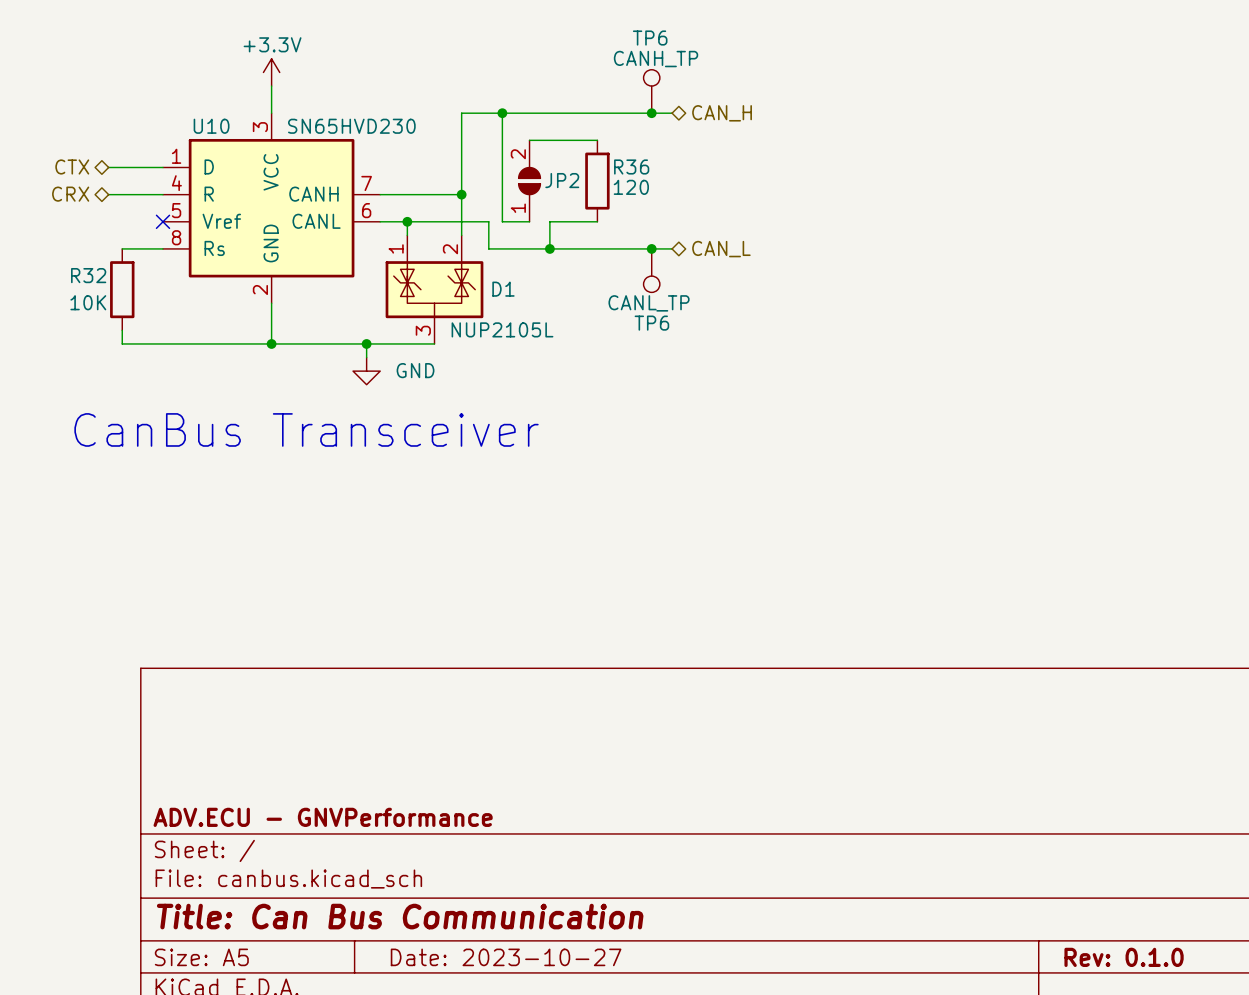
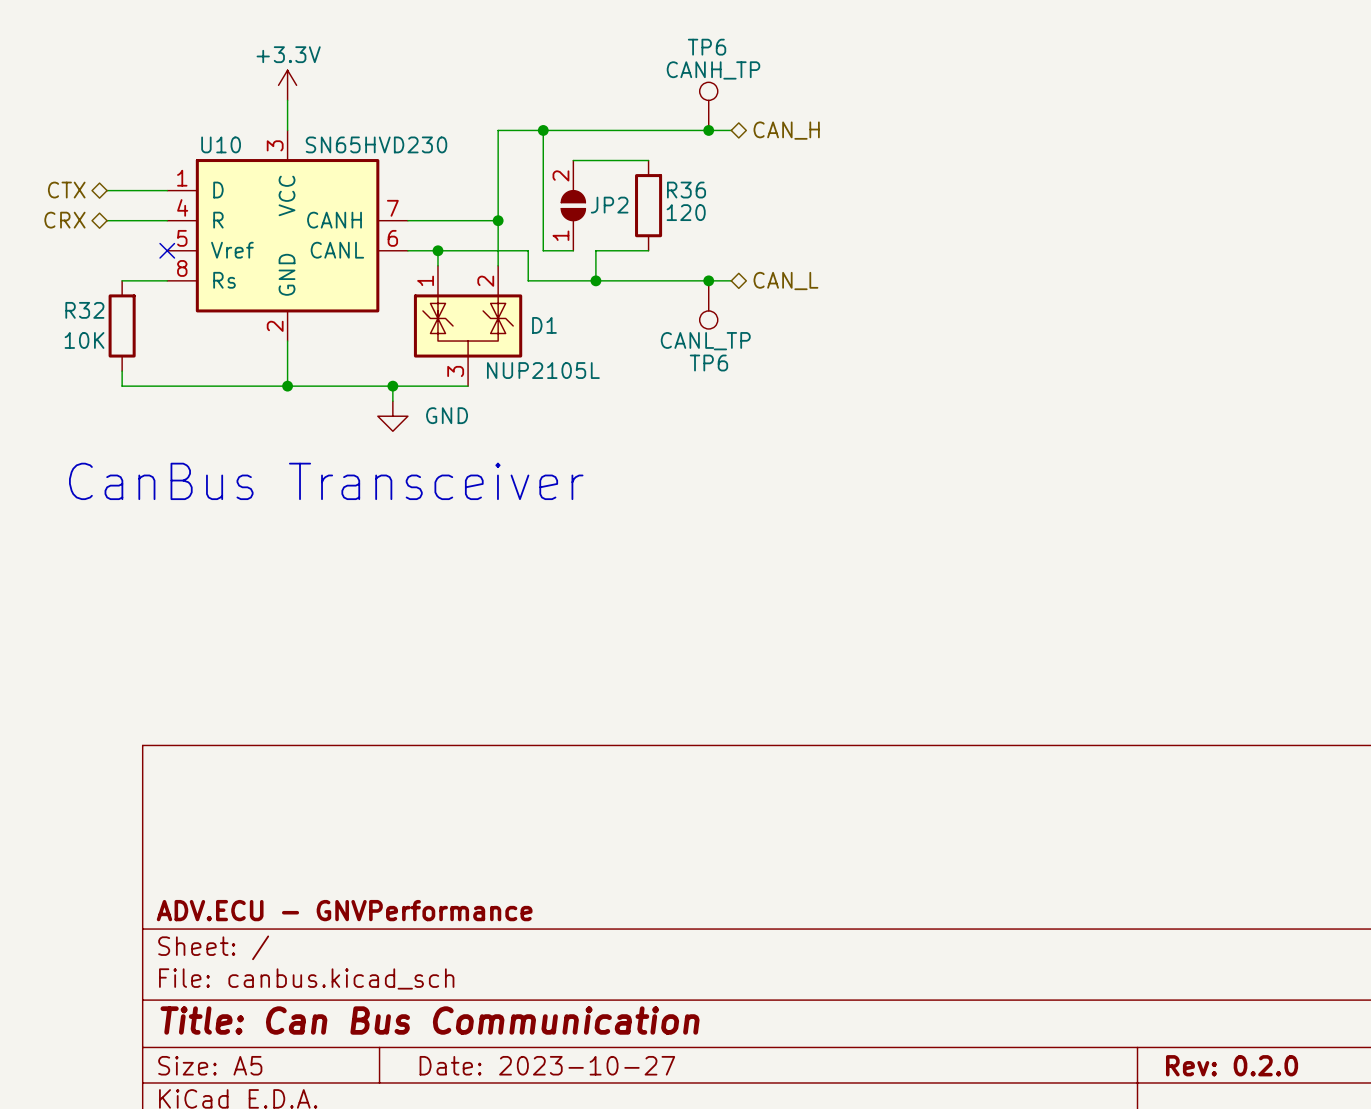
title block: Rev: 0.1.0 (1124, 957) -> Rev: 0.2.0 (1232, 1065)

